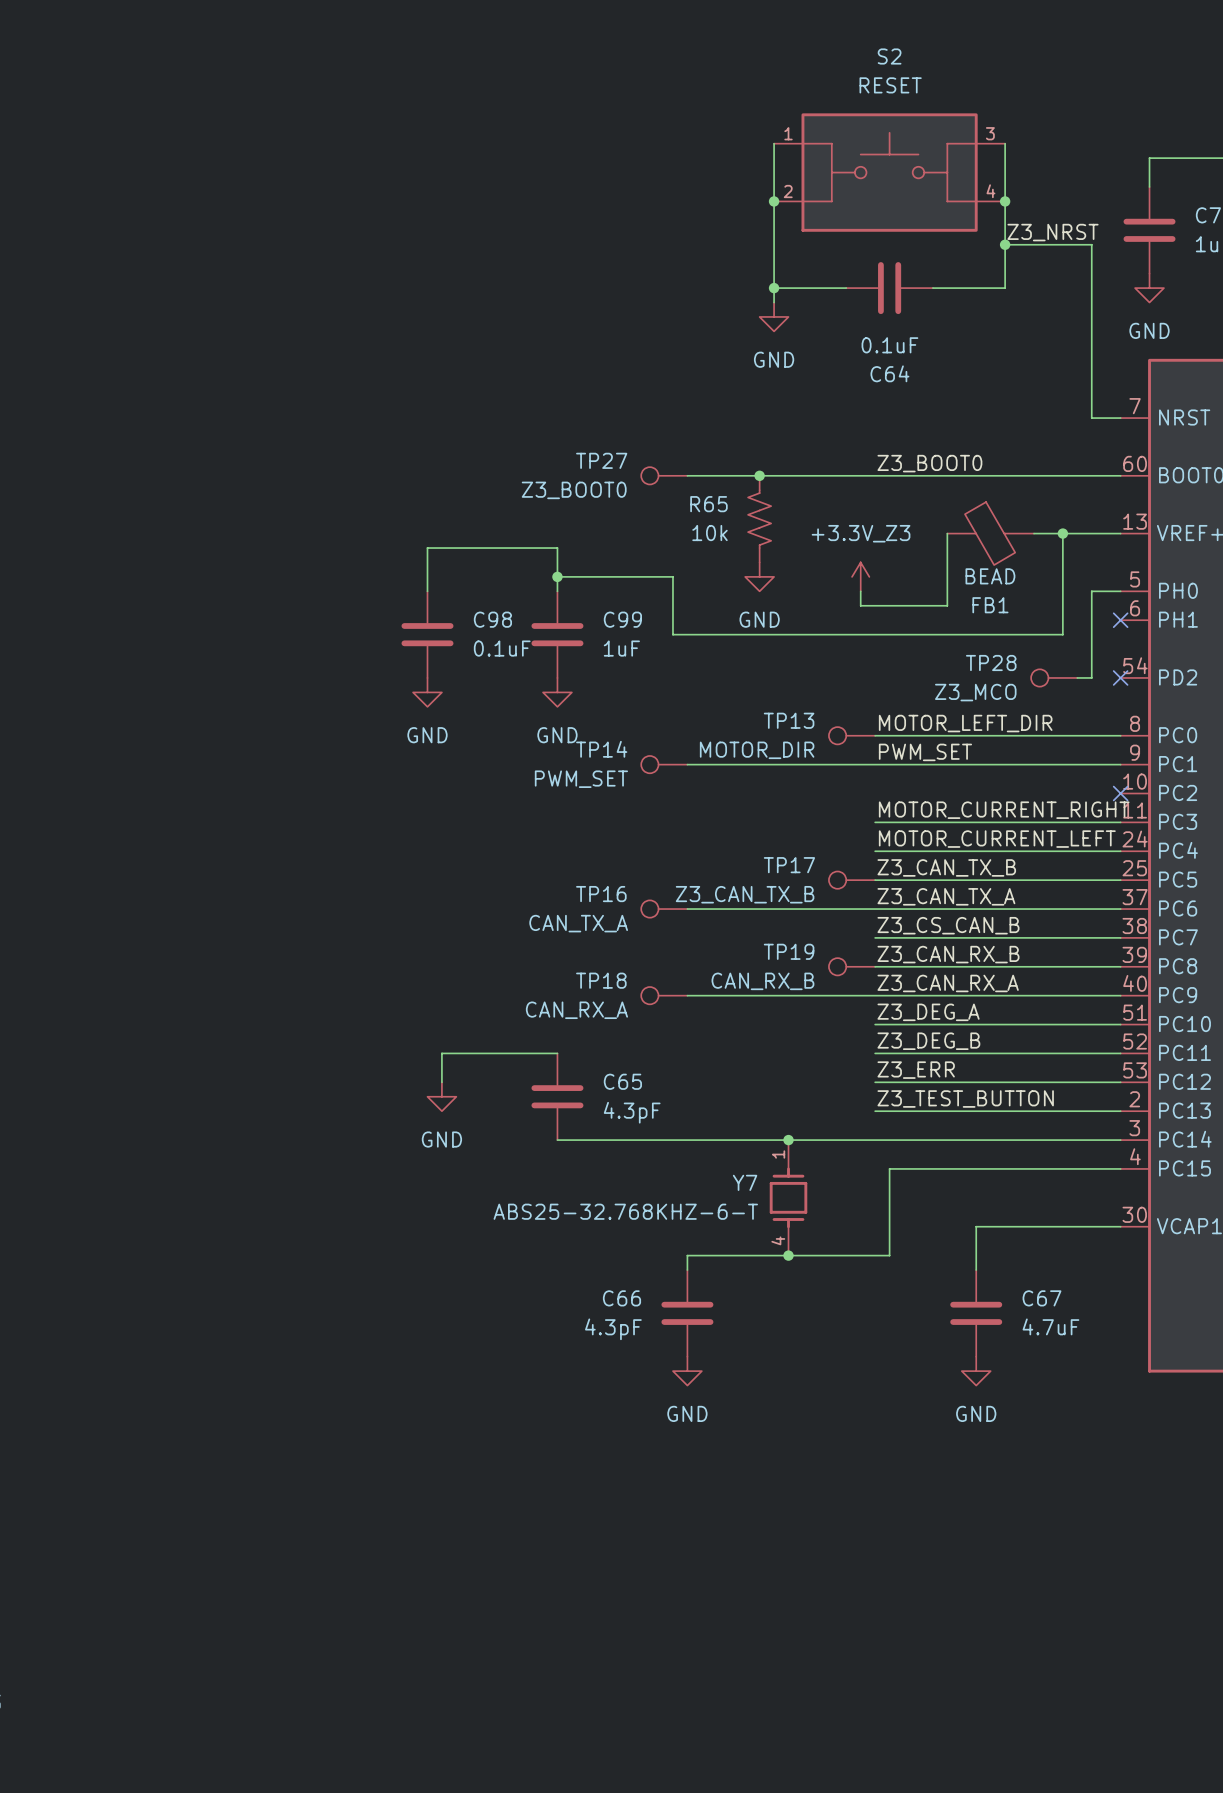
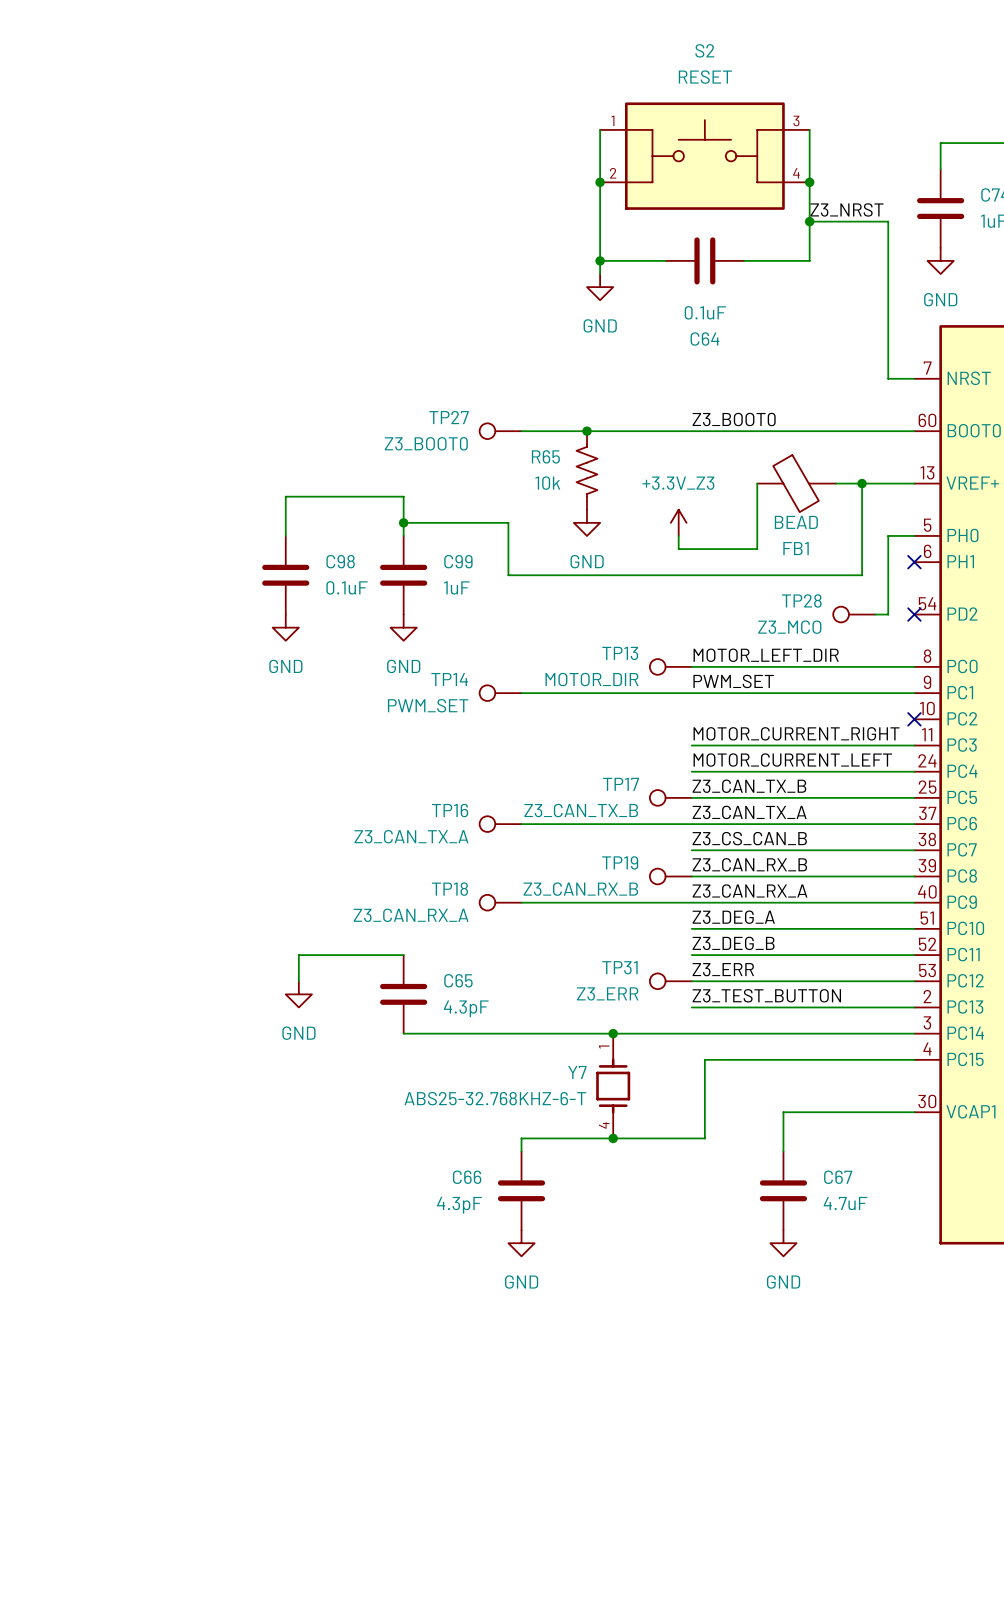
TP16 value: CAN_TX_A (578, 923) -> Z3_CAN_TX_A (411, 836)
TP19 value: CAN_RX_B (762, 981) -> Z3_CAN_RX_B (580, 889)
TP18 value: CAN_RX_A (576, 1010) -> Z3_CAN_RX_A (411, 915)
TP31: none -> Z3_ERR (670, 981)

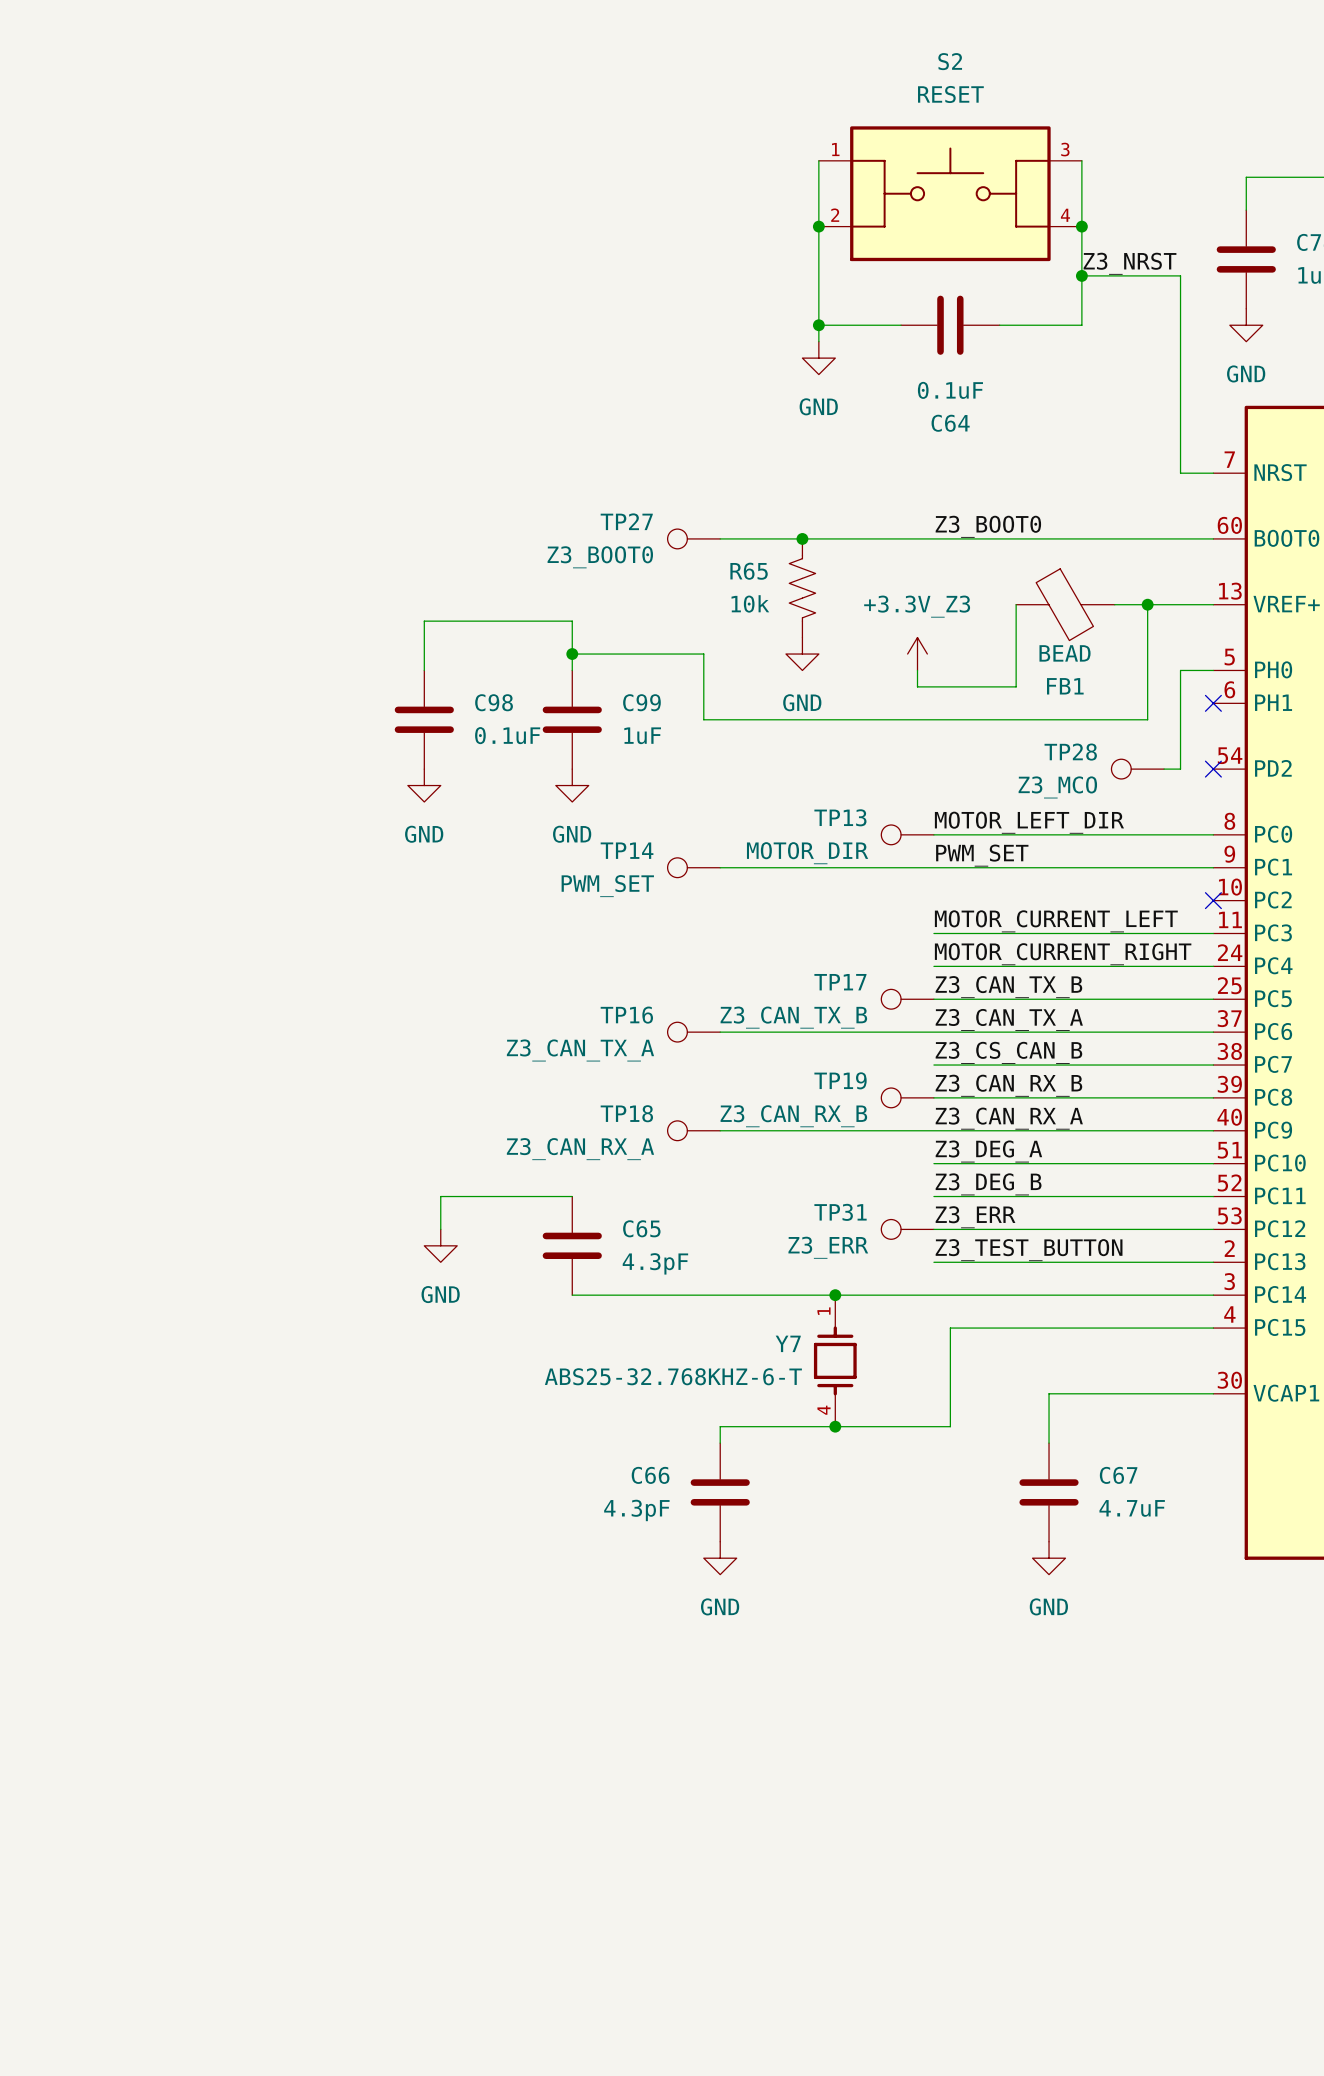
label: MOTOR_CURRENT_RIGHT (796, 733) -> MOTOR_CURRENT_LEFT (1056, 921)
label: MOTOR_CURRENT_LEFT (792, 760) -> MOTOR_CURRENT_RIGHT (1063, 954)

